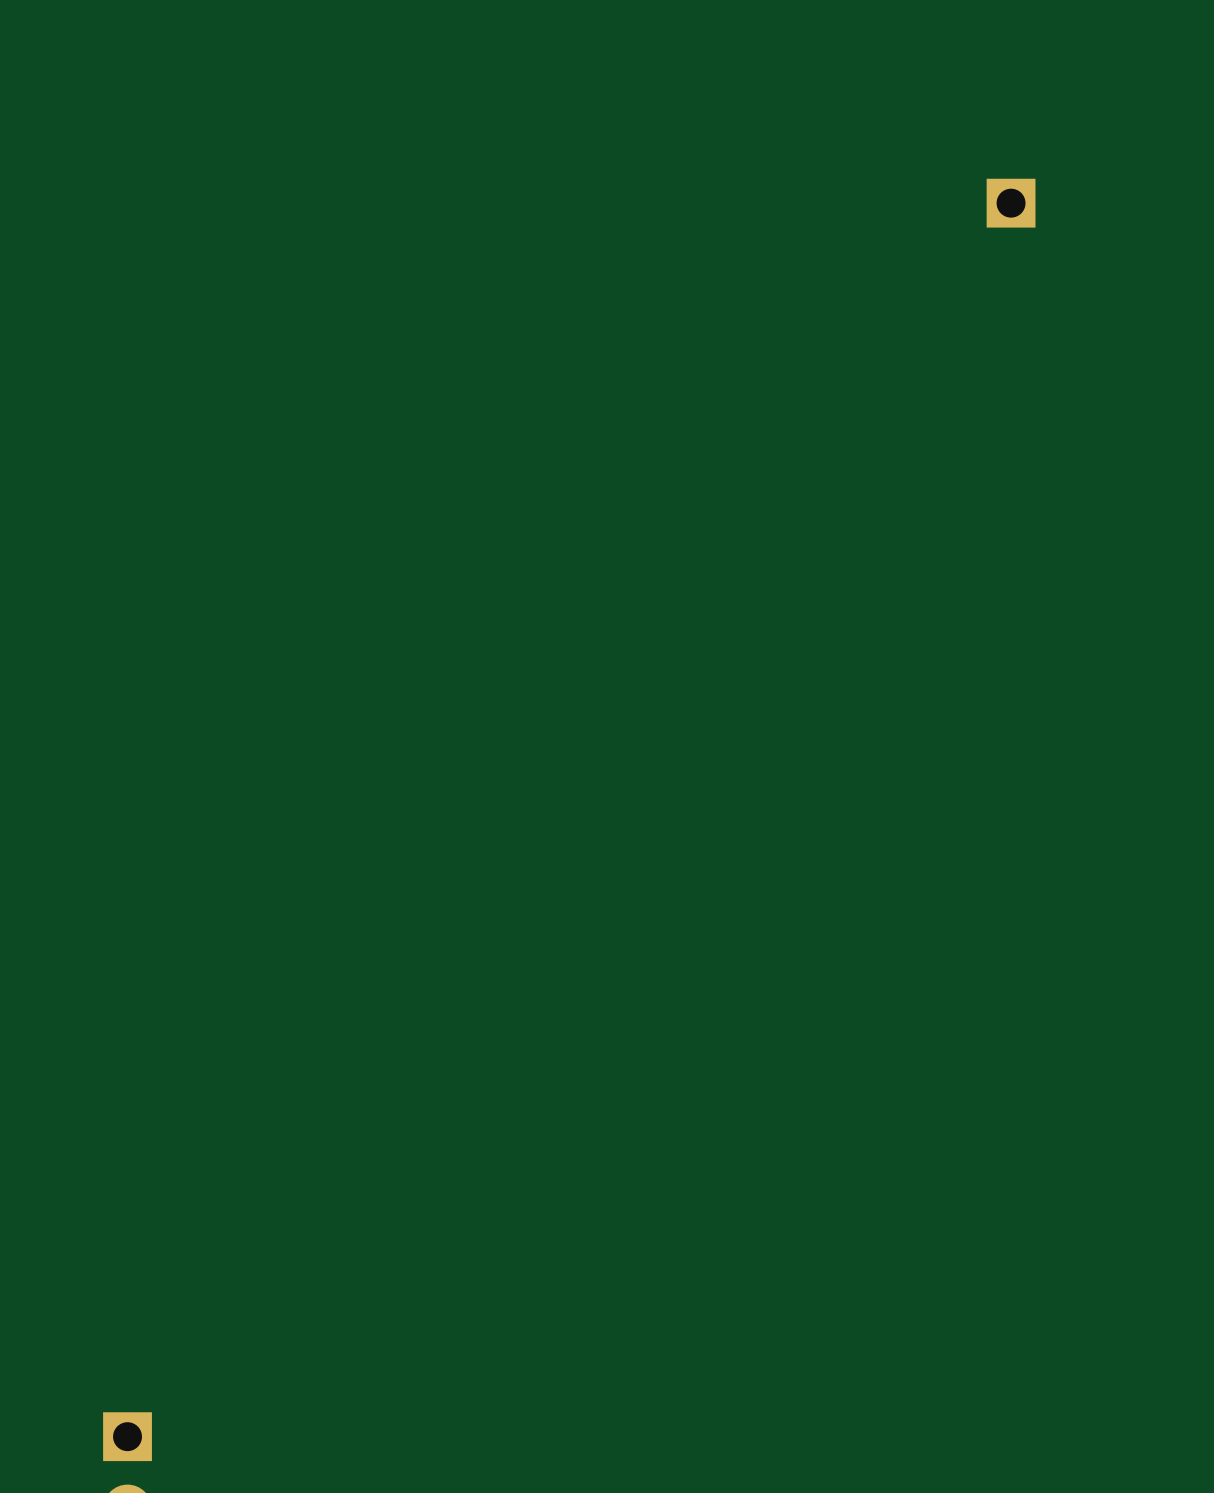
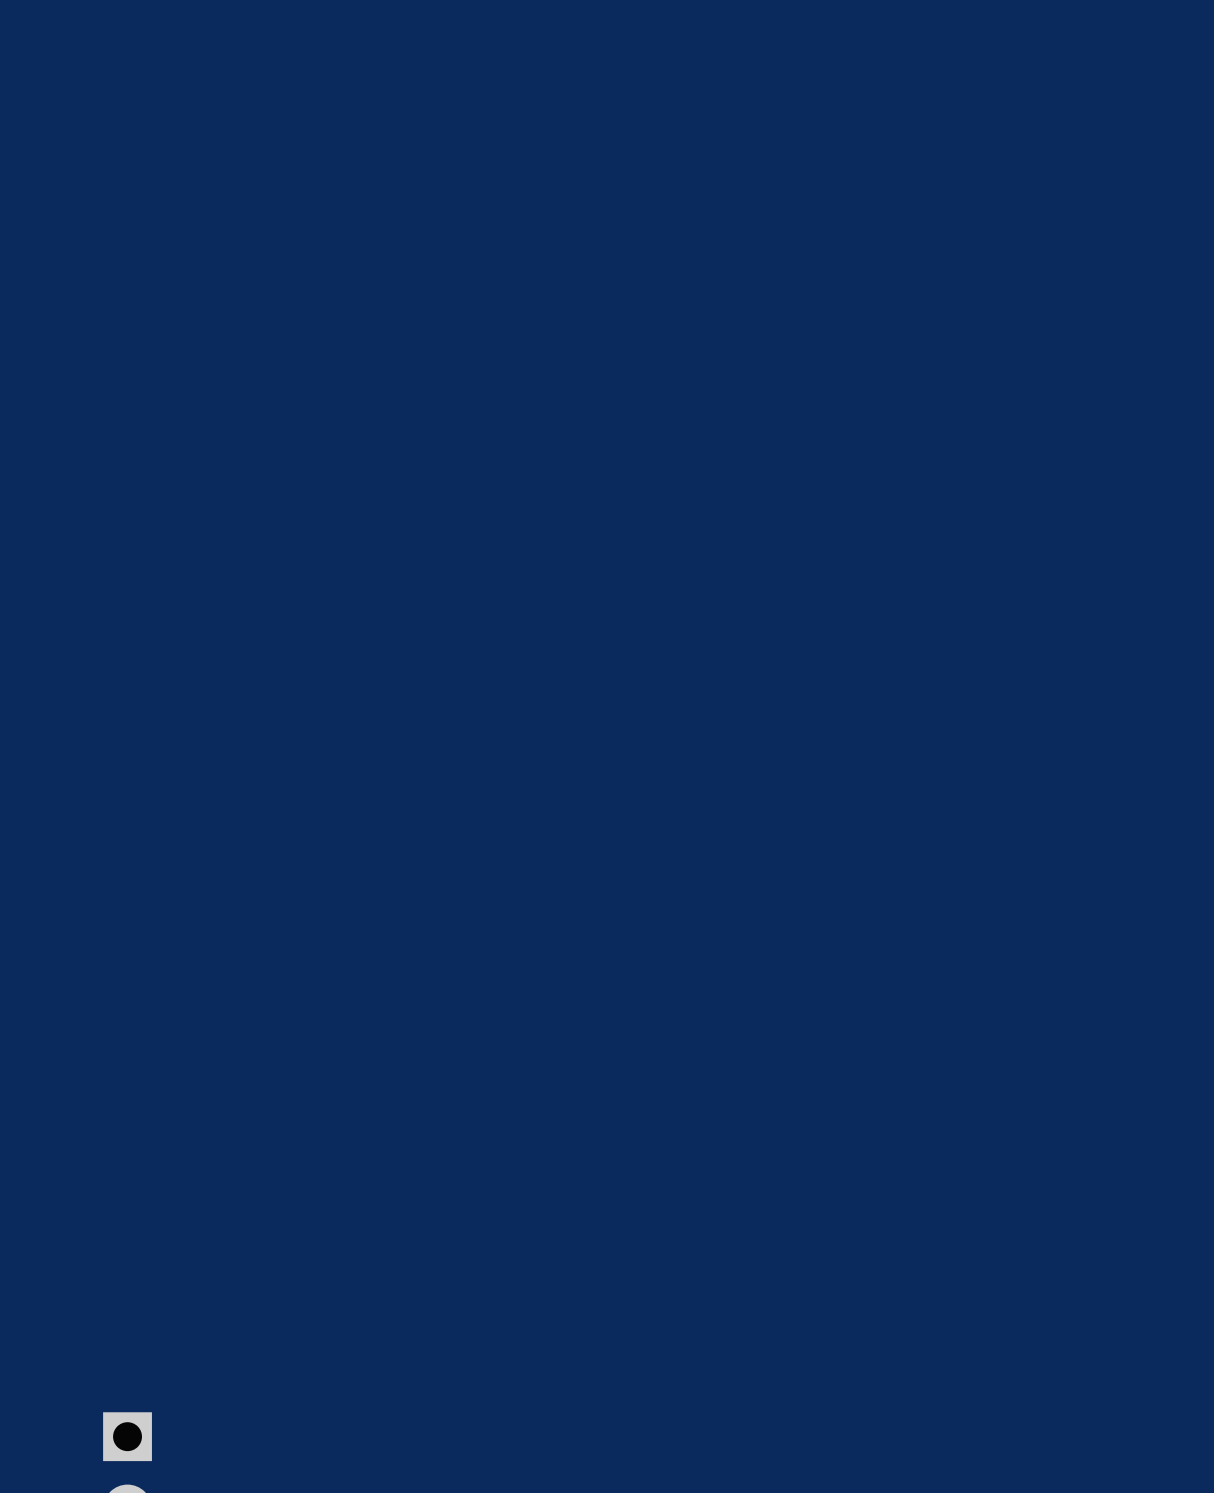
part: (1011, 203) -> none

